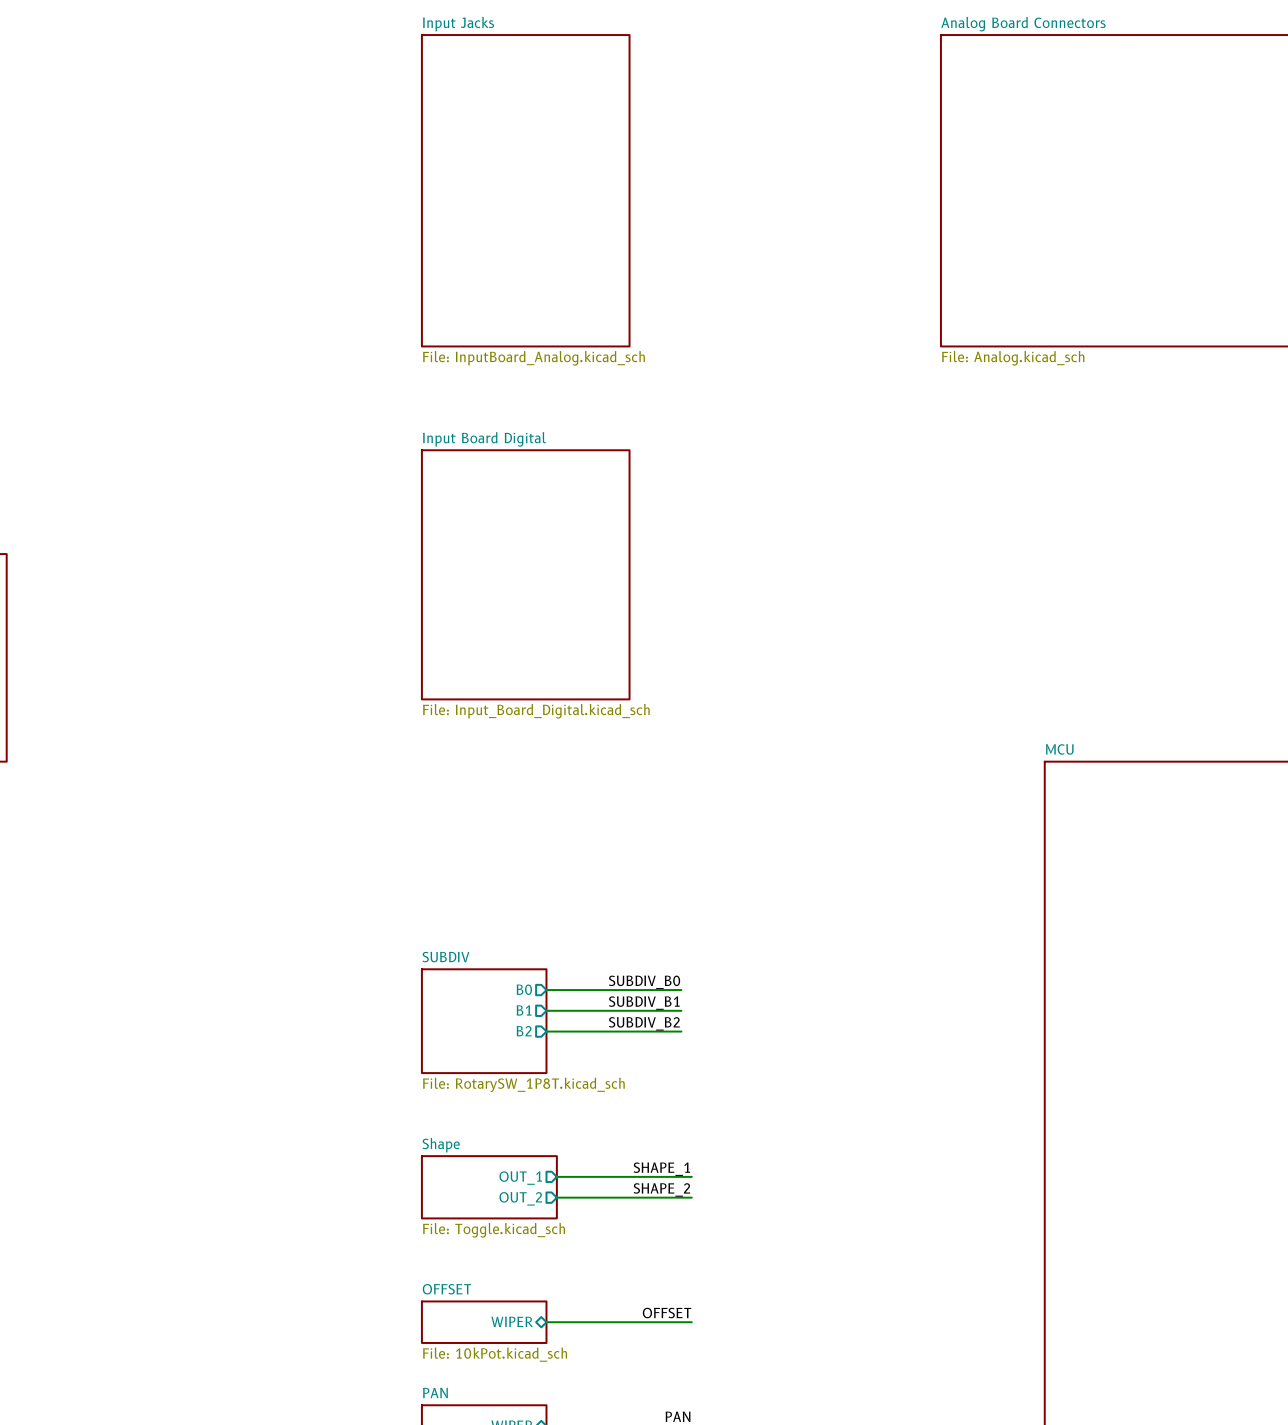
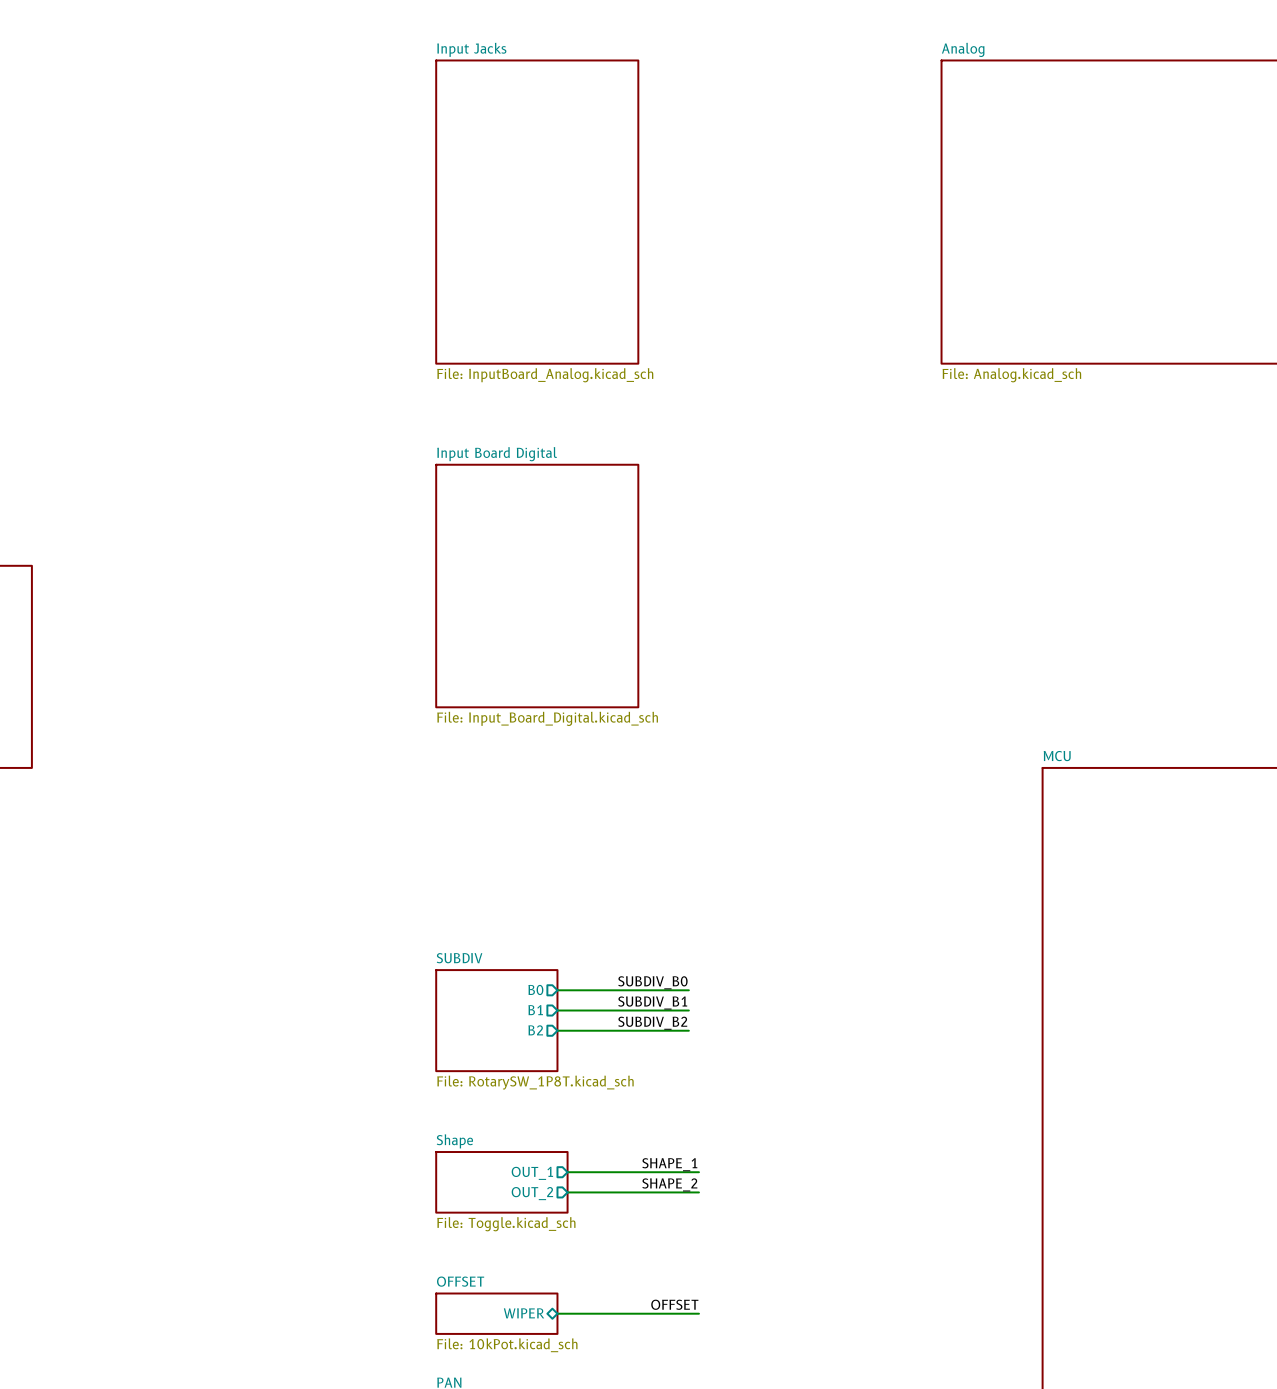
sheet Analog Board Connectors name: Analog Board Connectors (1023, 24) -> Analog (963, 49)

